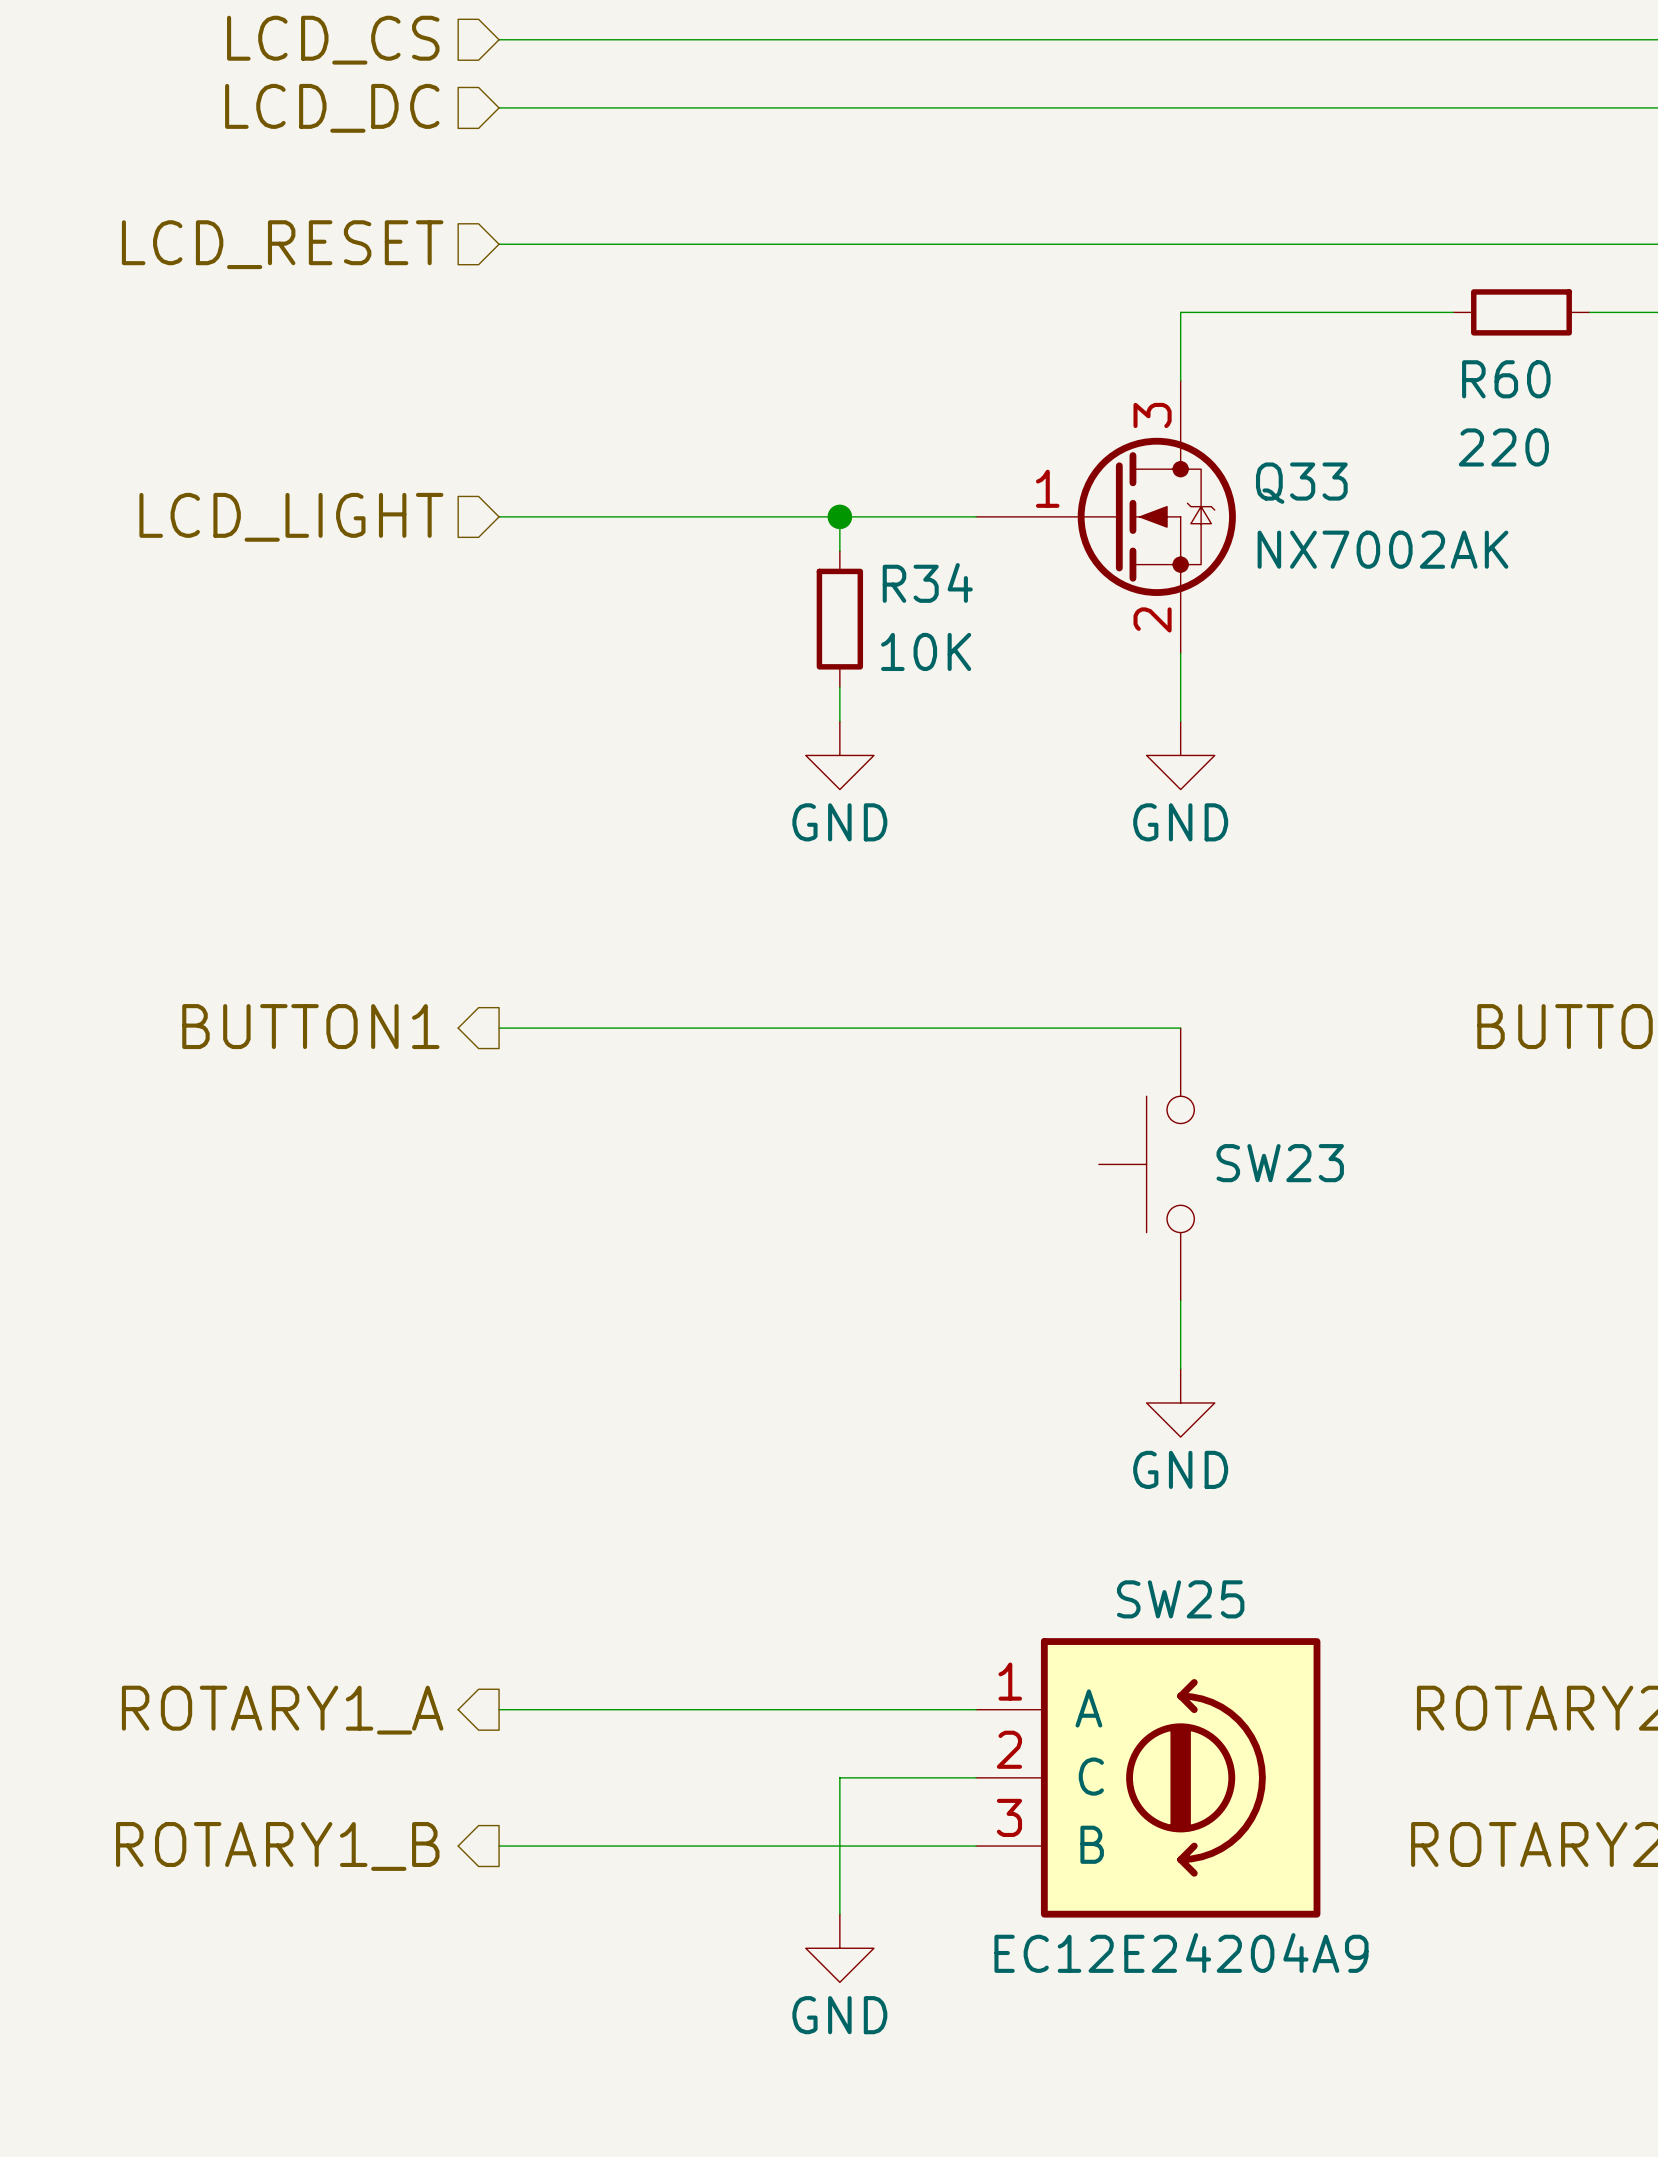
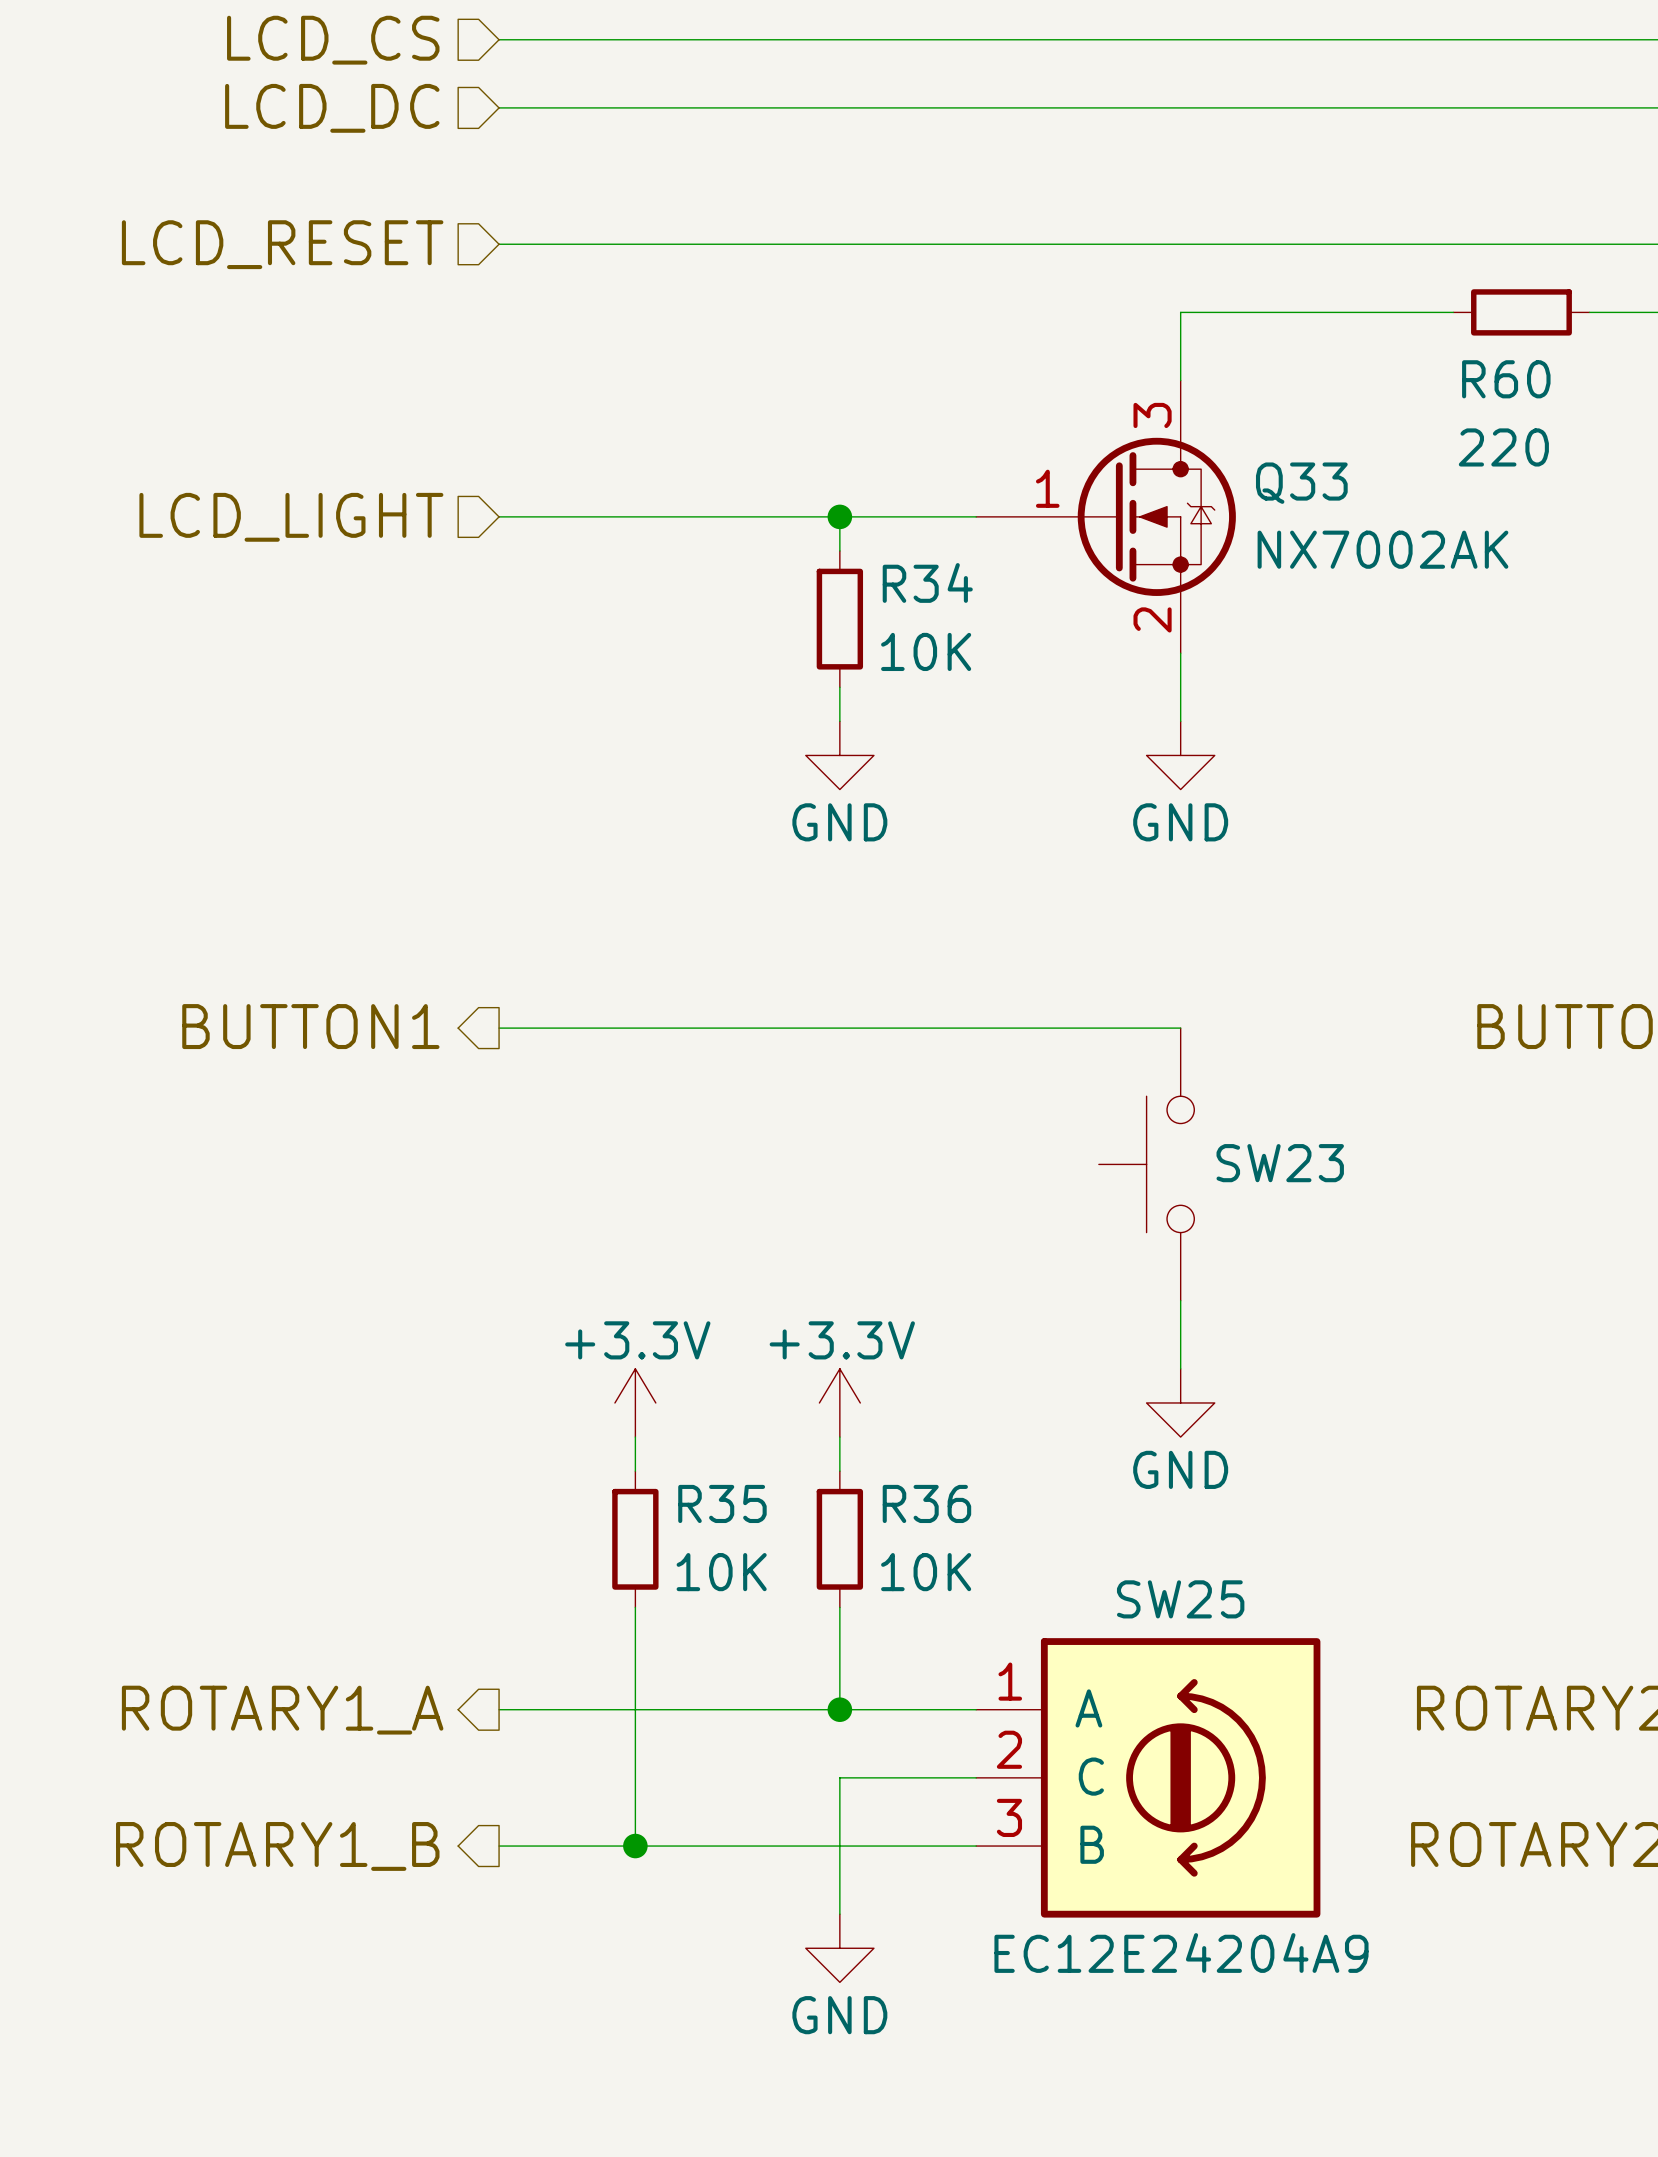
power symbol: none -> +3.3V (635, 1402)
power symbol: none -> +3.3V (839, 1402)
wire: none -> (635, 1437) (635, 1471)
wire: none -> (839, 1437) (839, 1471)
R35: none -> 10K (635, 1539)
R36: none -> 10K (839, 1539)
wire: none -> (635, 1607) (635, 1846)
wire: none -> (839, 1607) (839, 1709)
junction: none -> (839, 1709)
junction: none -> (635, 1846)

